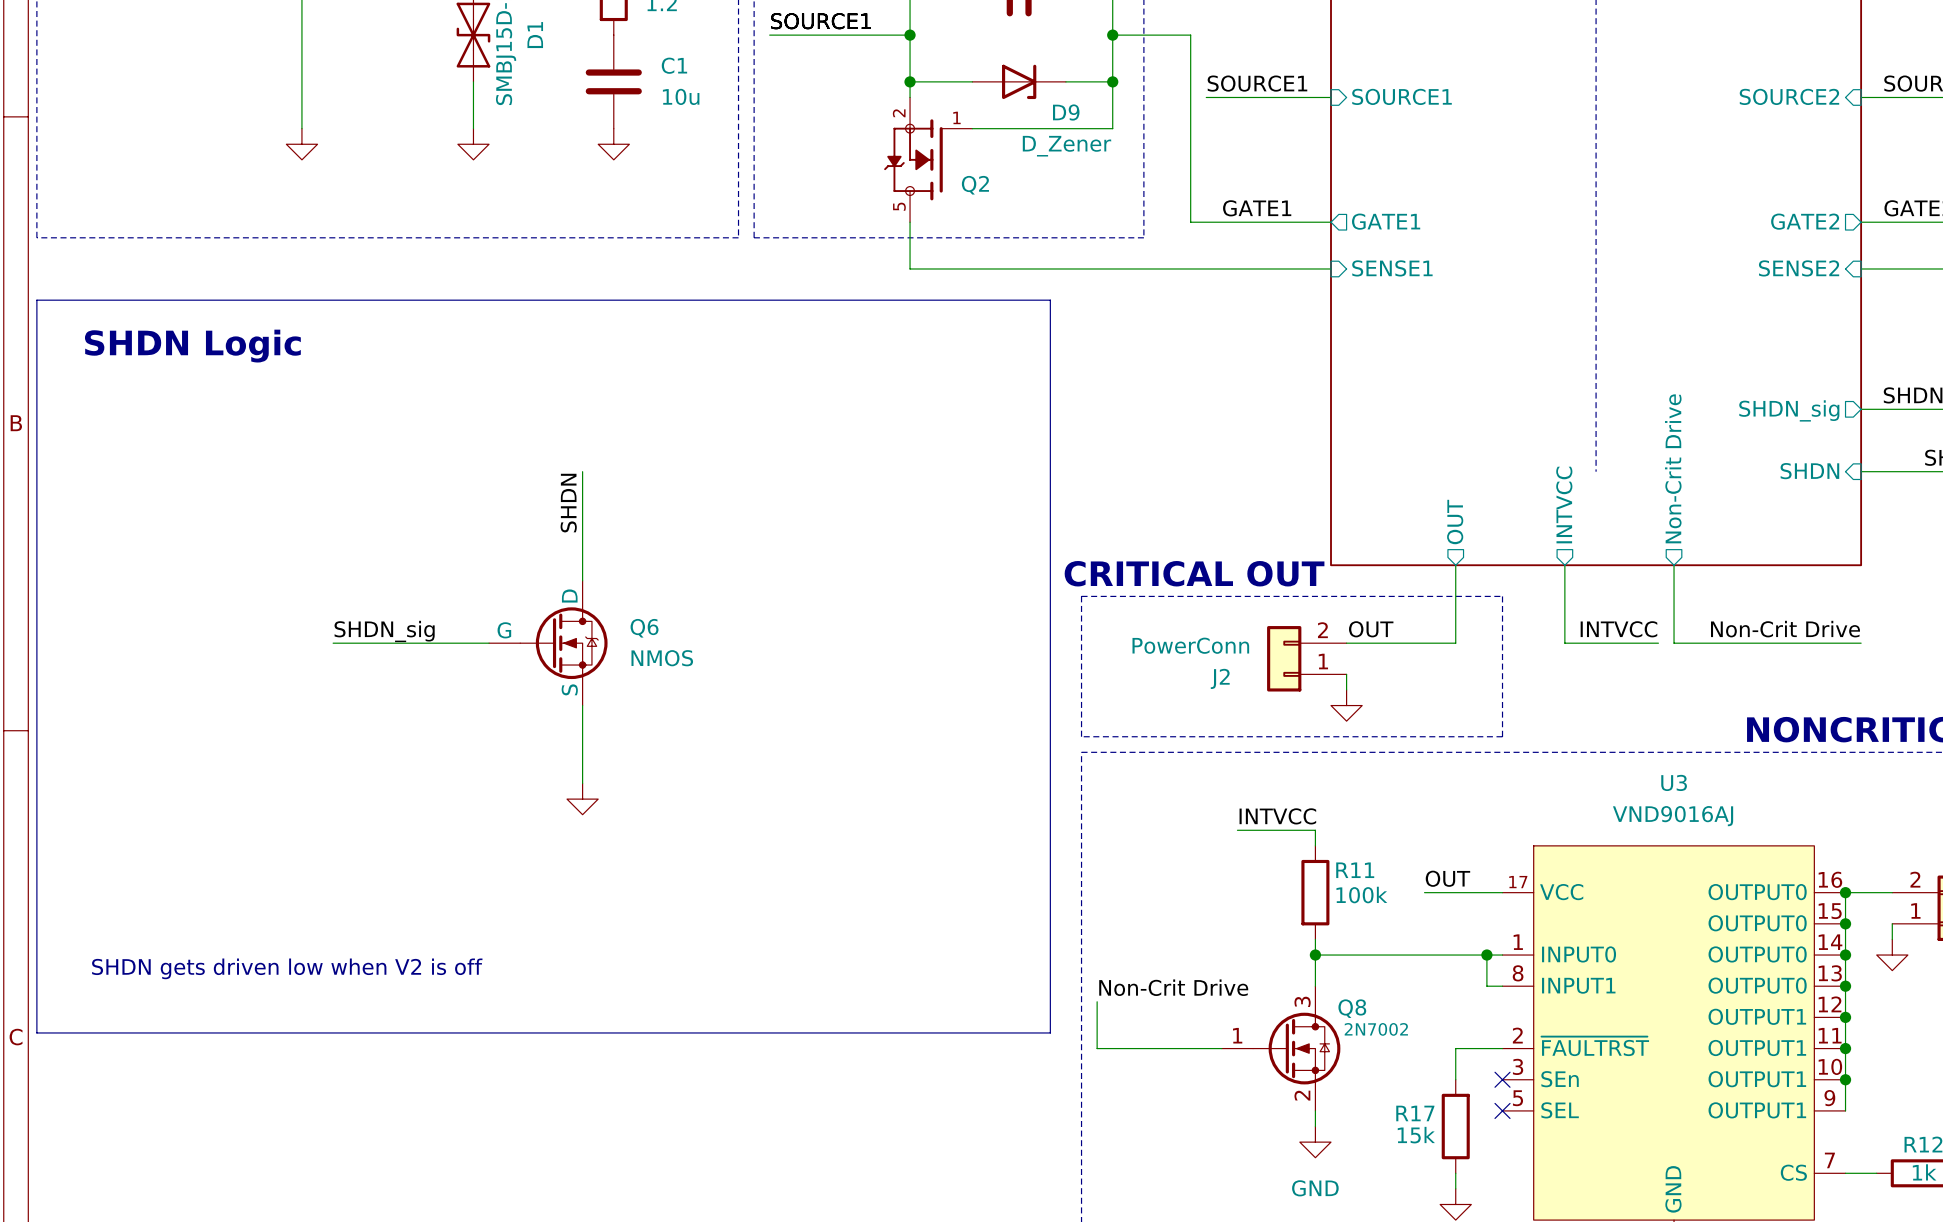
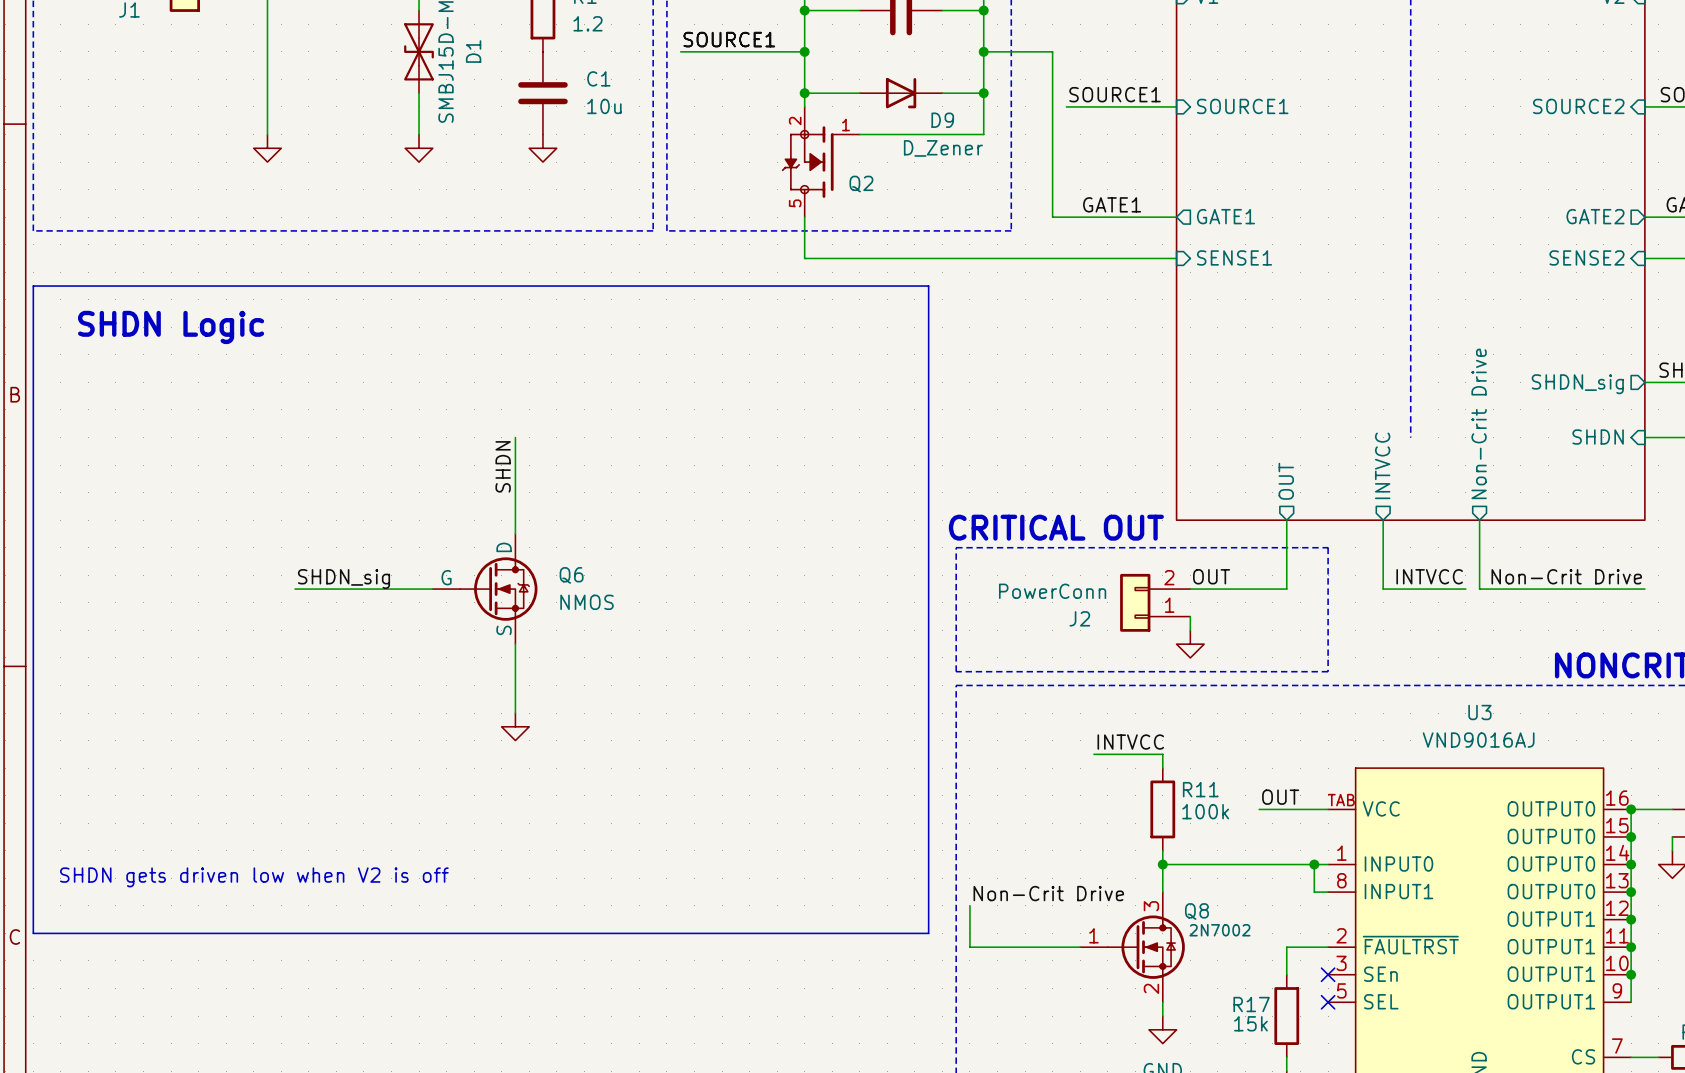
U3 pin number: 17 (1518, 882) -> TAB (1341, 800)

